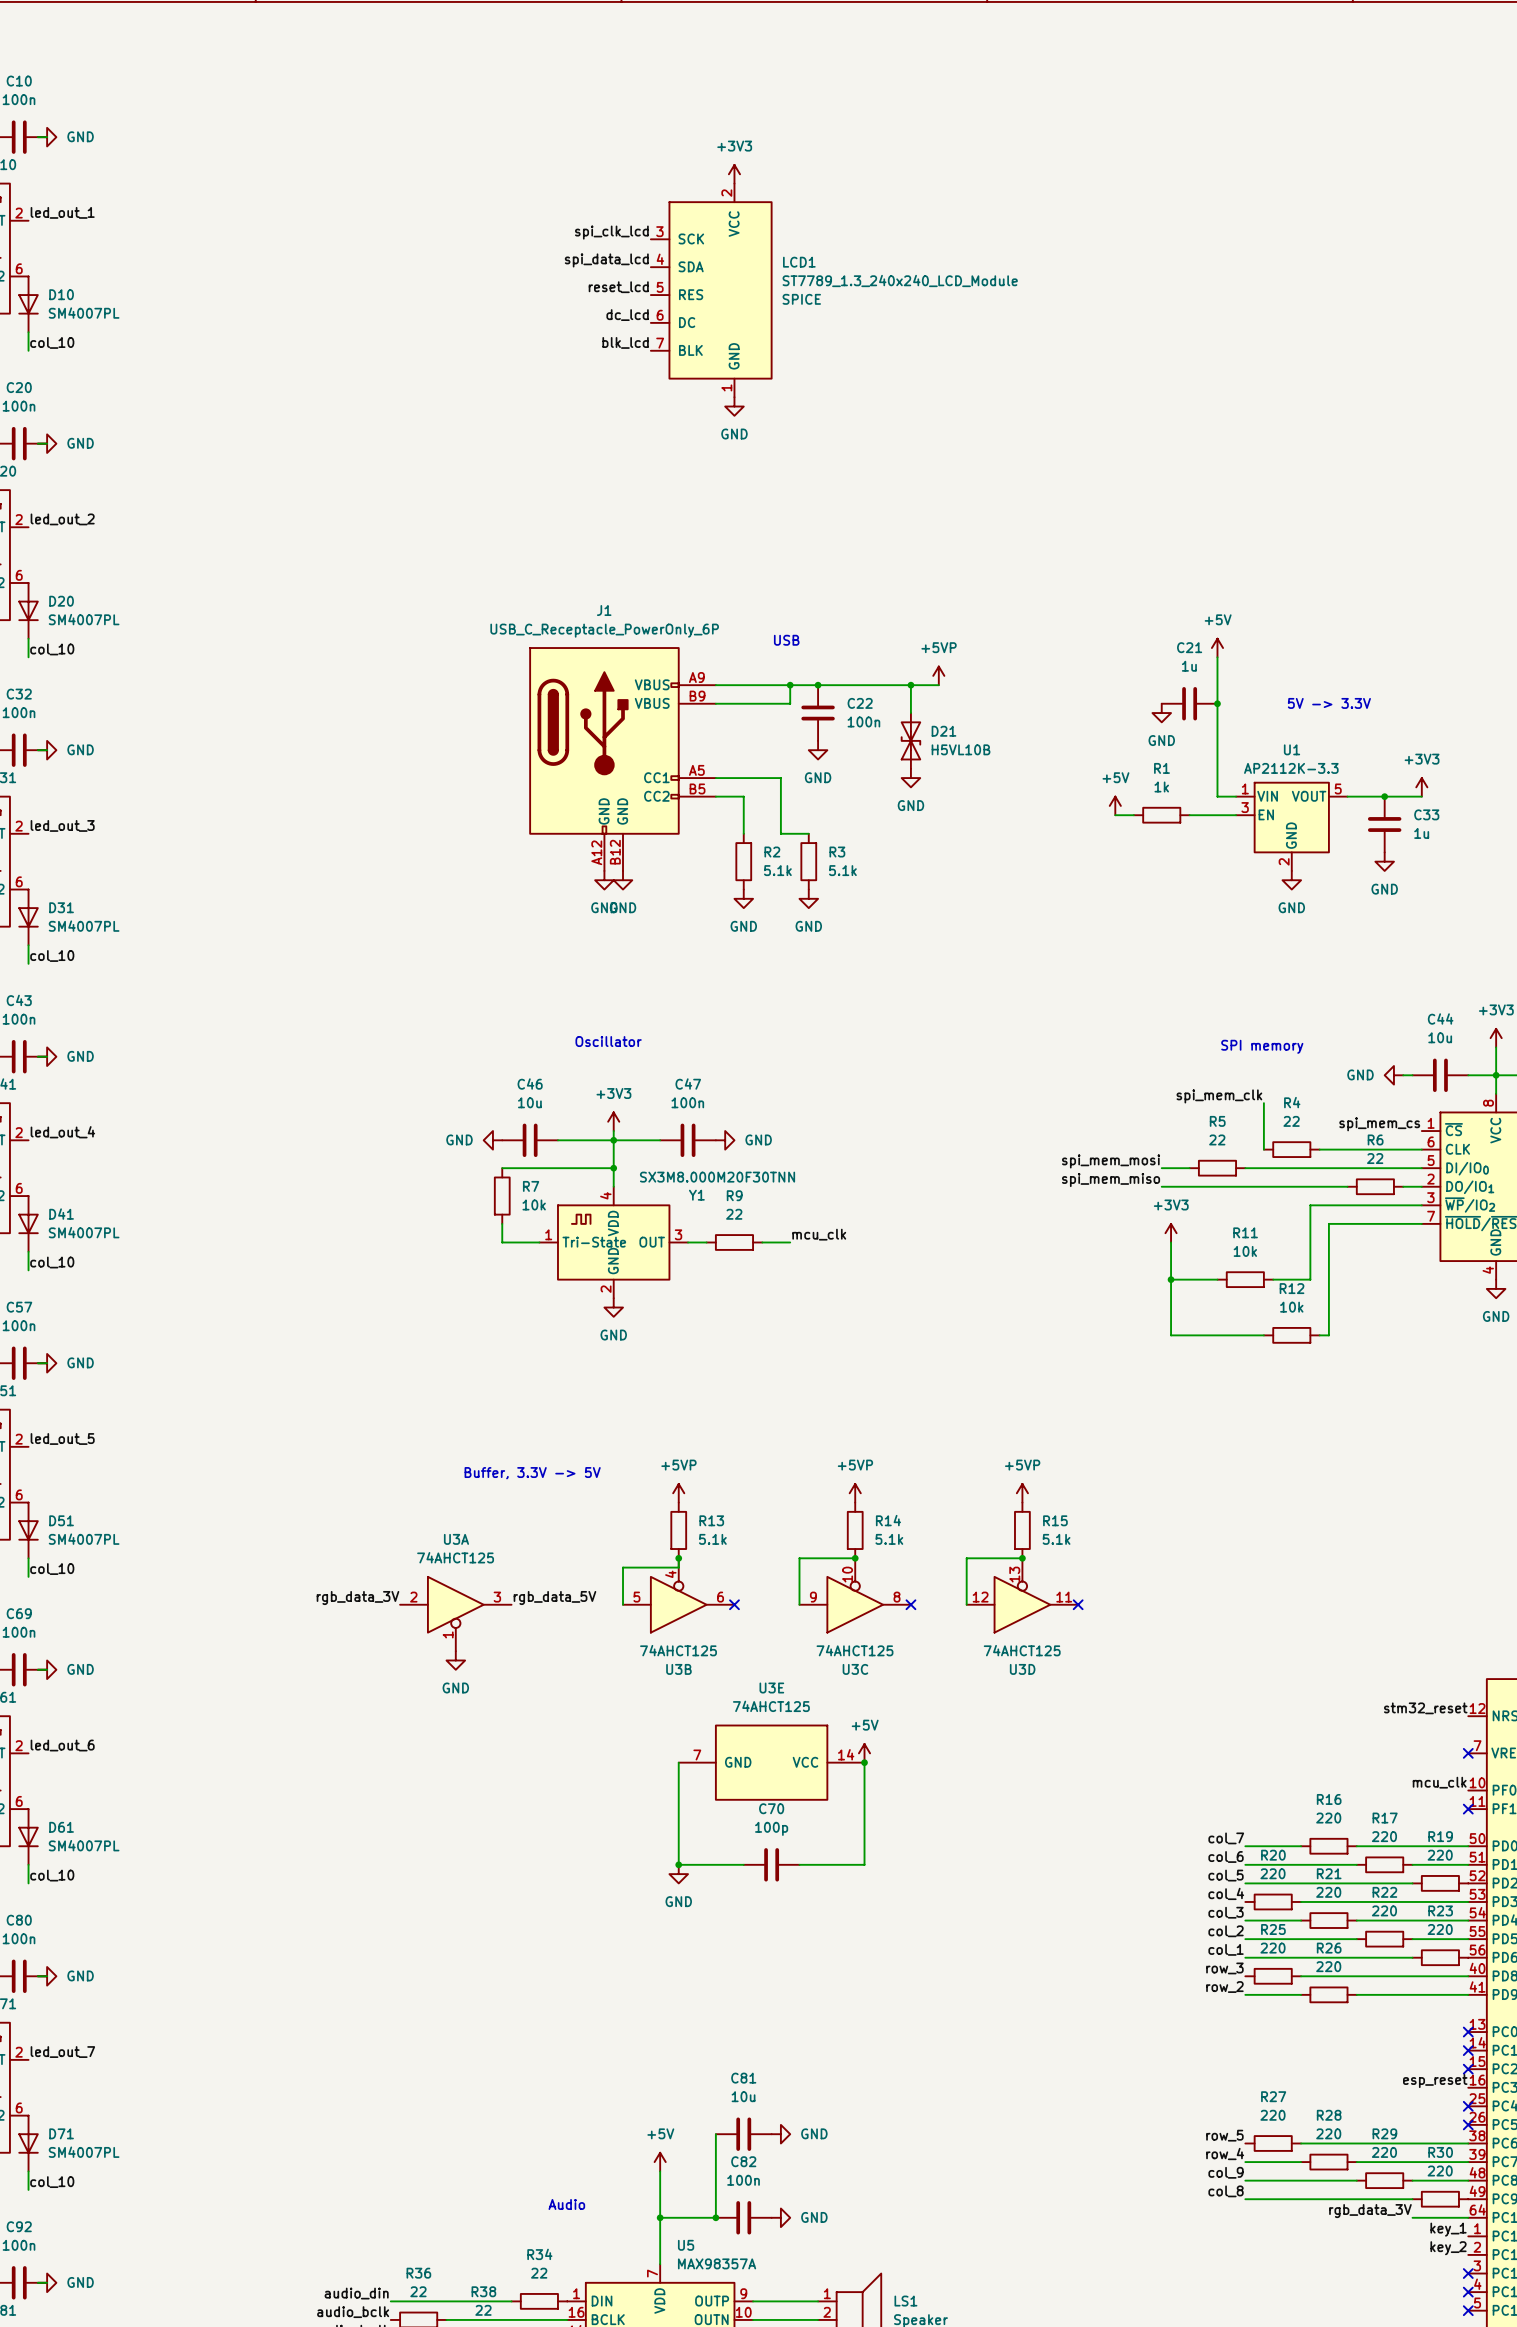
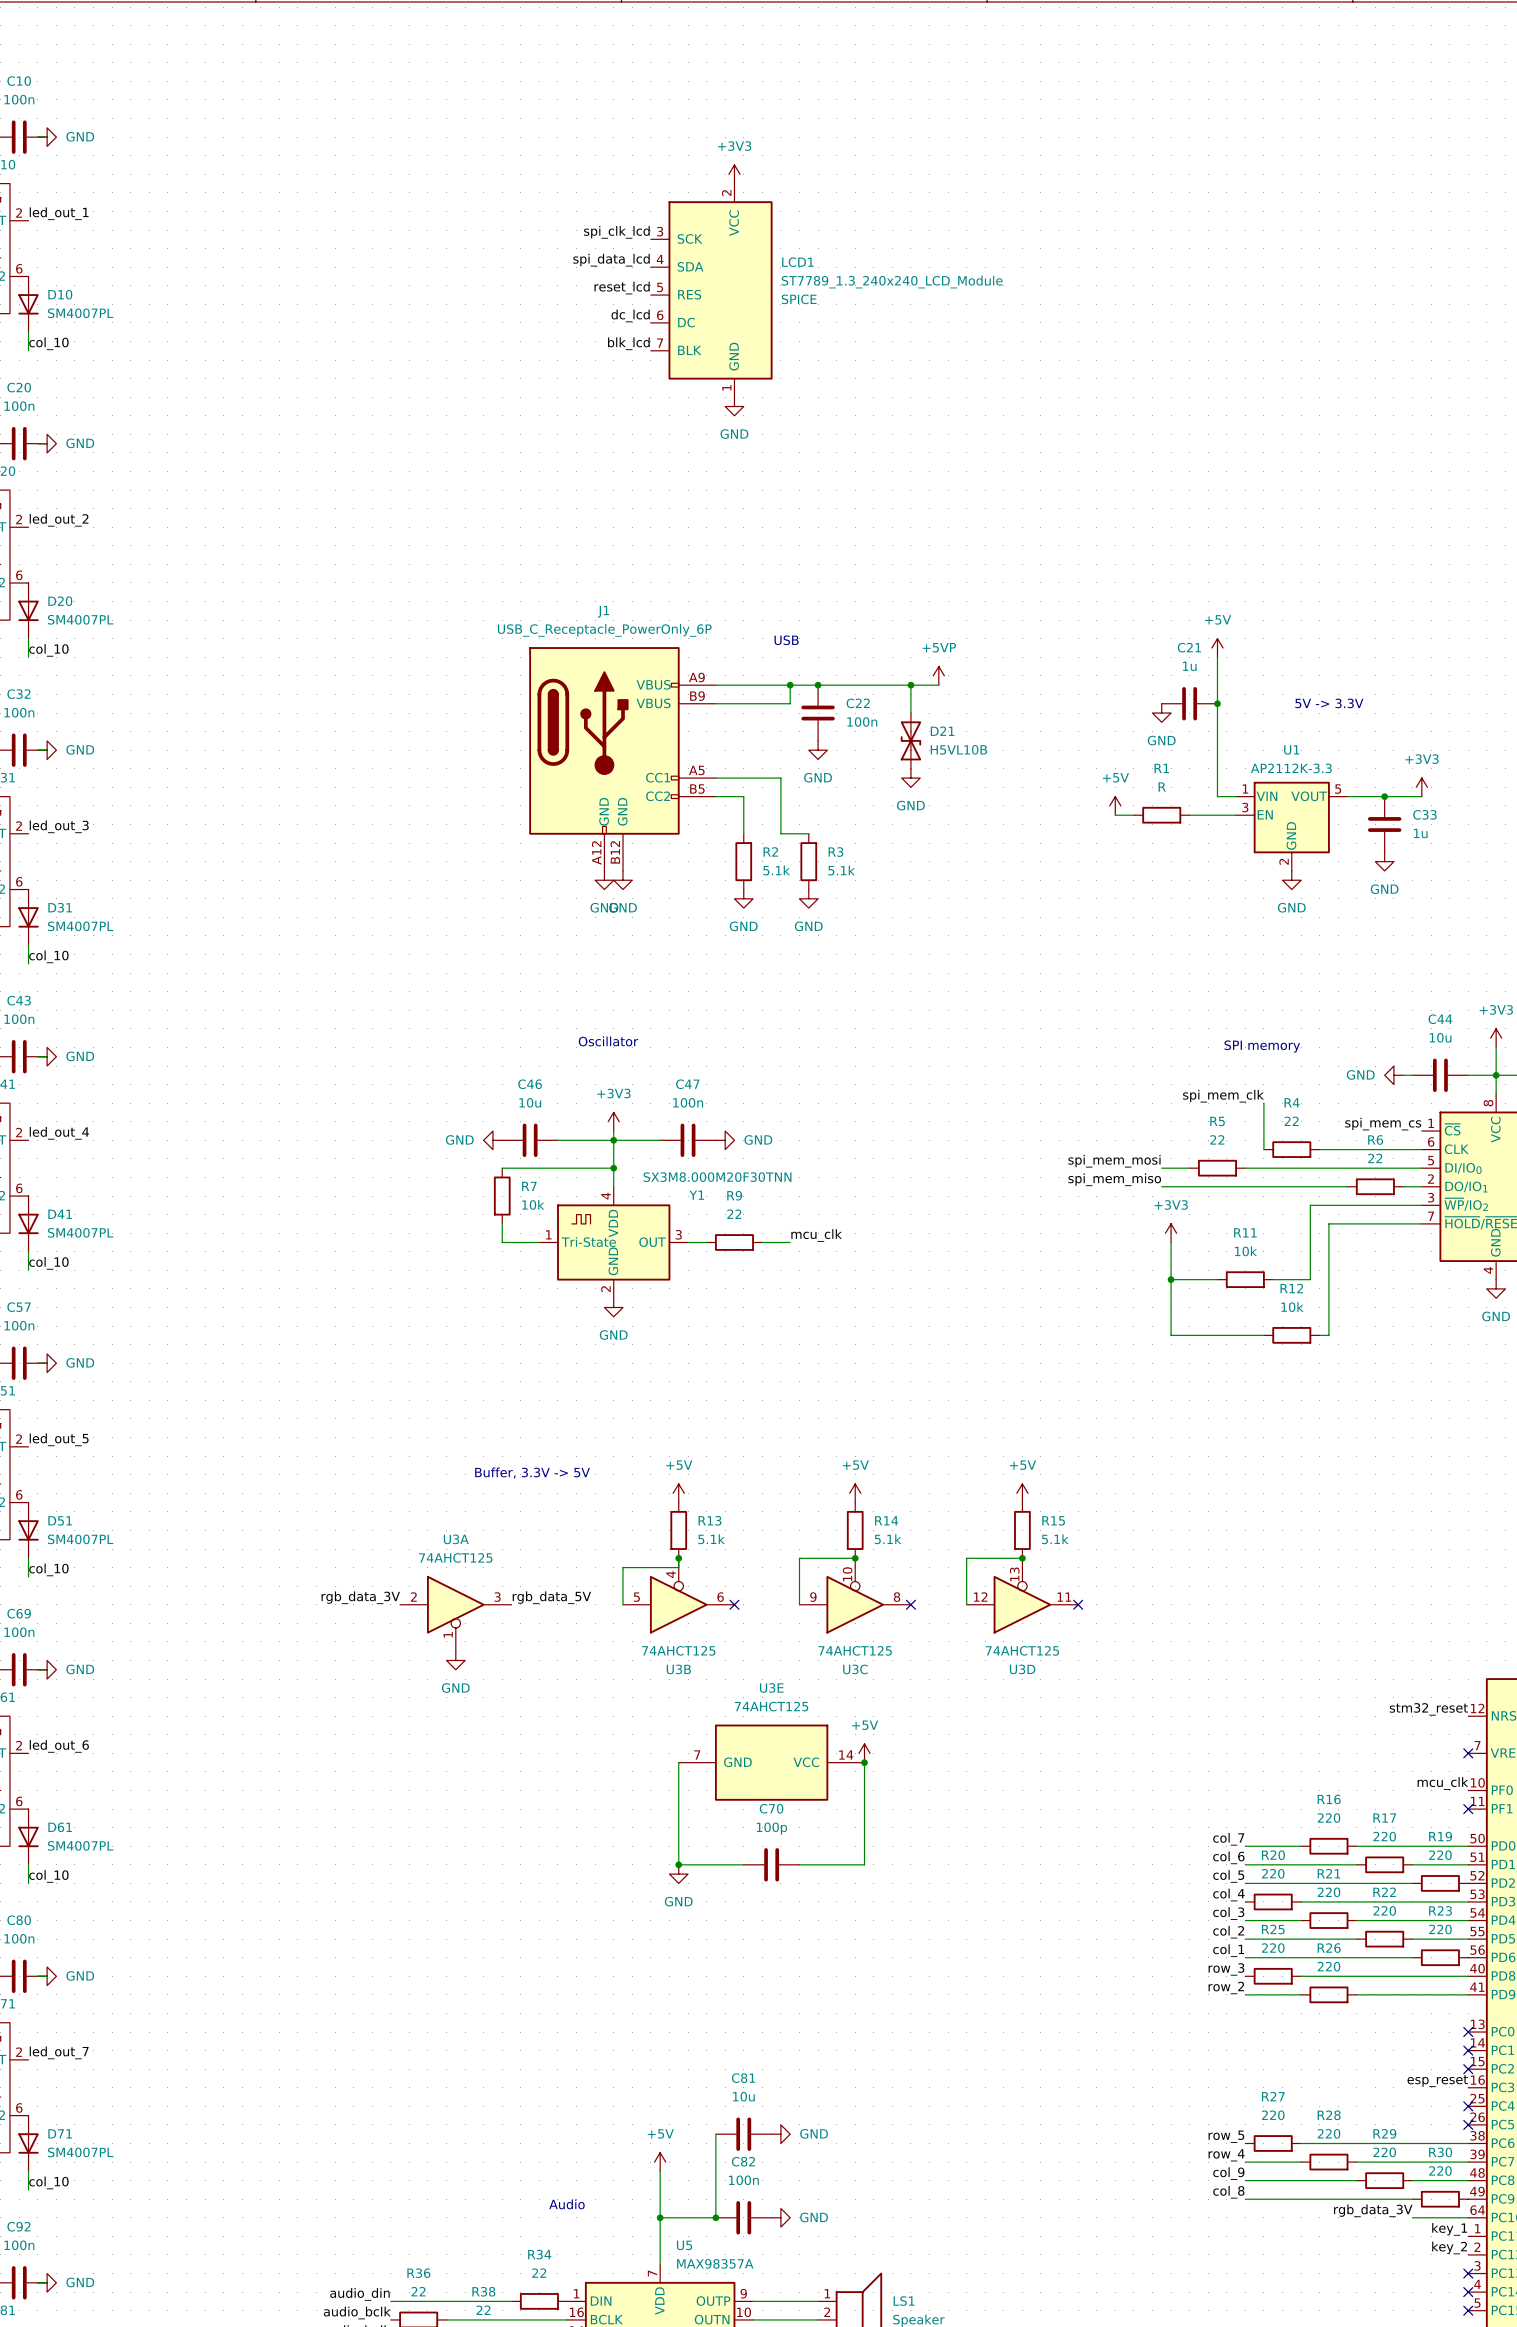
R1 value: 1k (1161, 787) -> R (1162, 787)
power symbol: +5VP (678, 1493) -> +5V (678, 1493)
power symbol: +5VP (855, 1493) -> +5V (855, 1493)
power symbol: +5VP (1022, 1493) -> +5V (1022, 1493)

